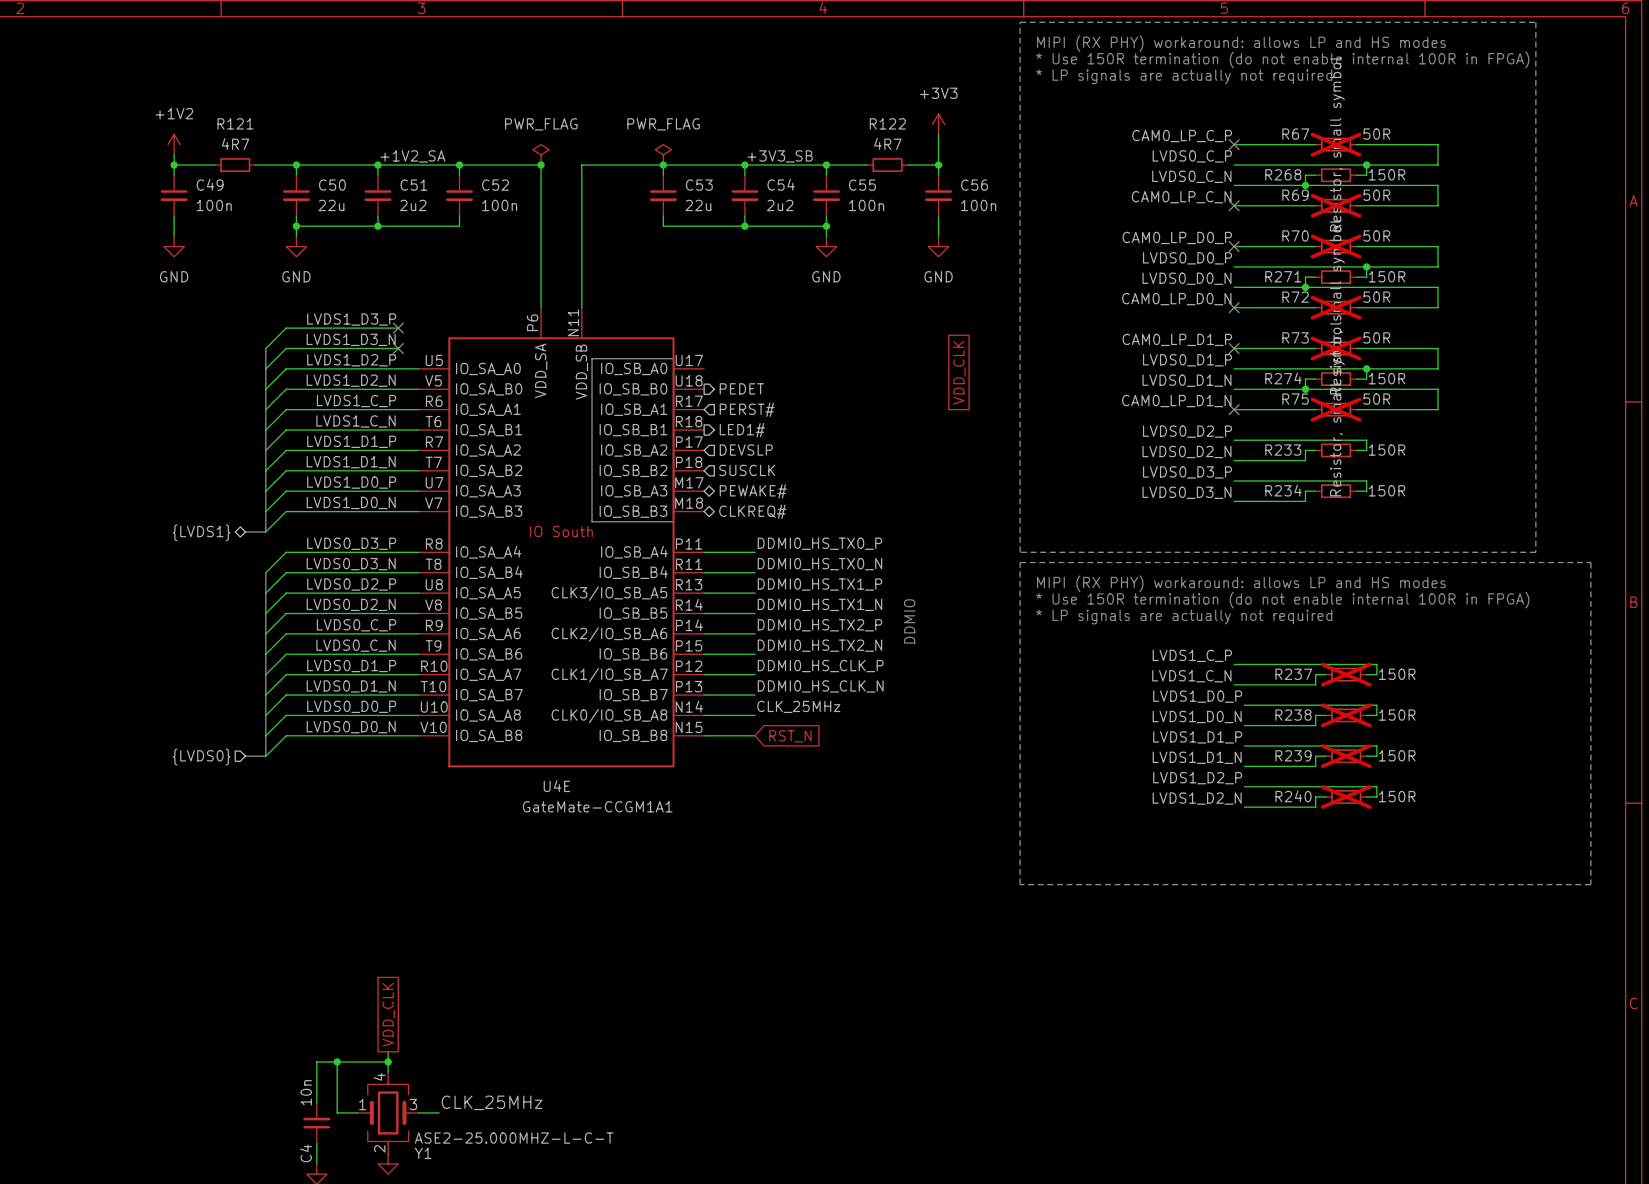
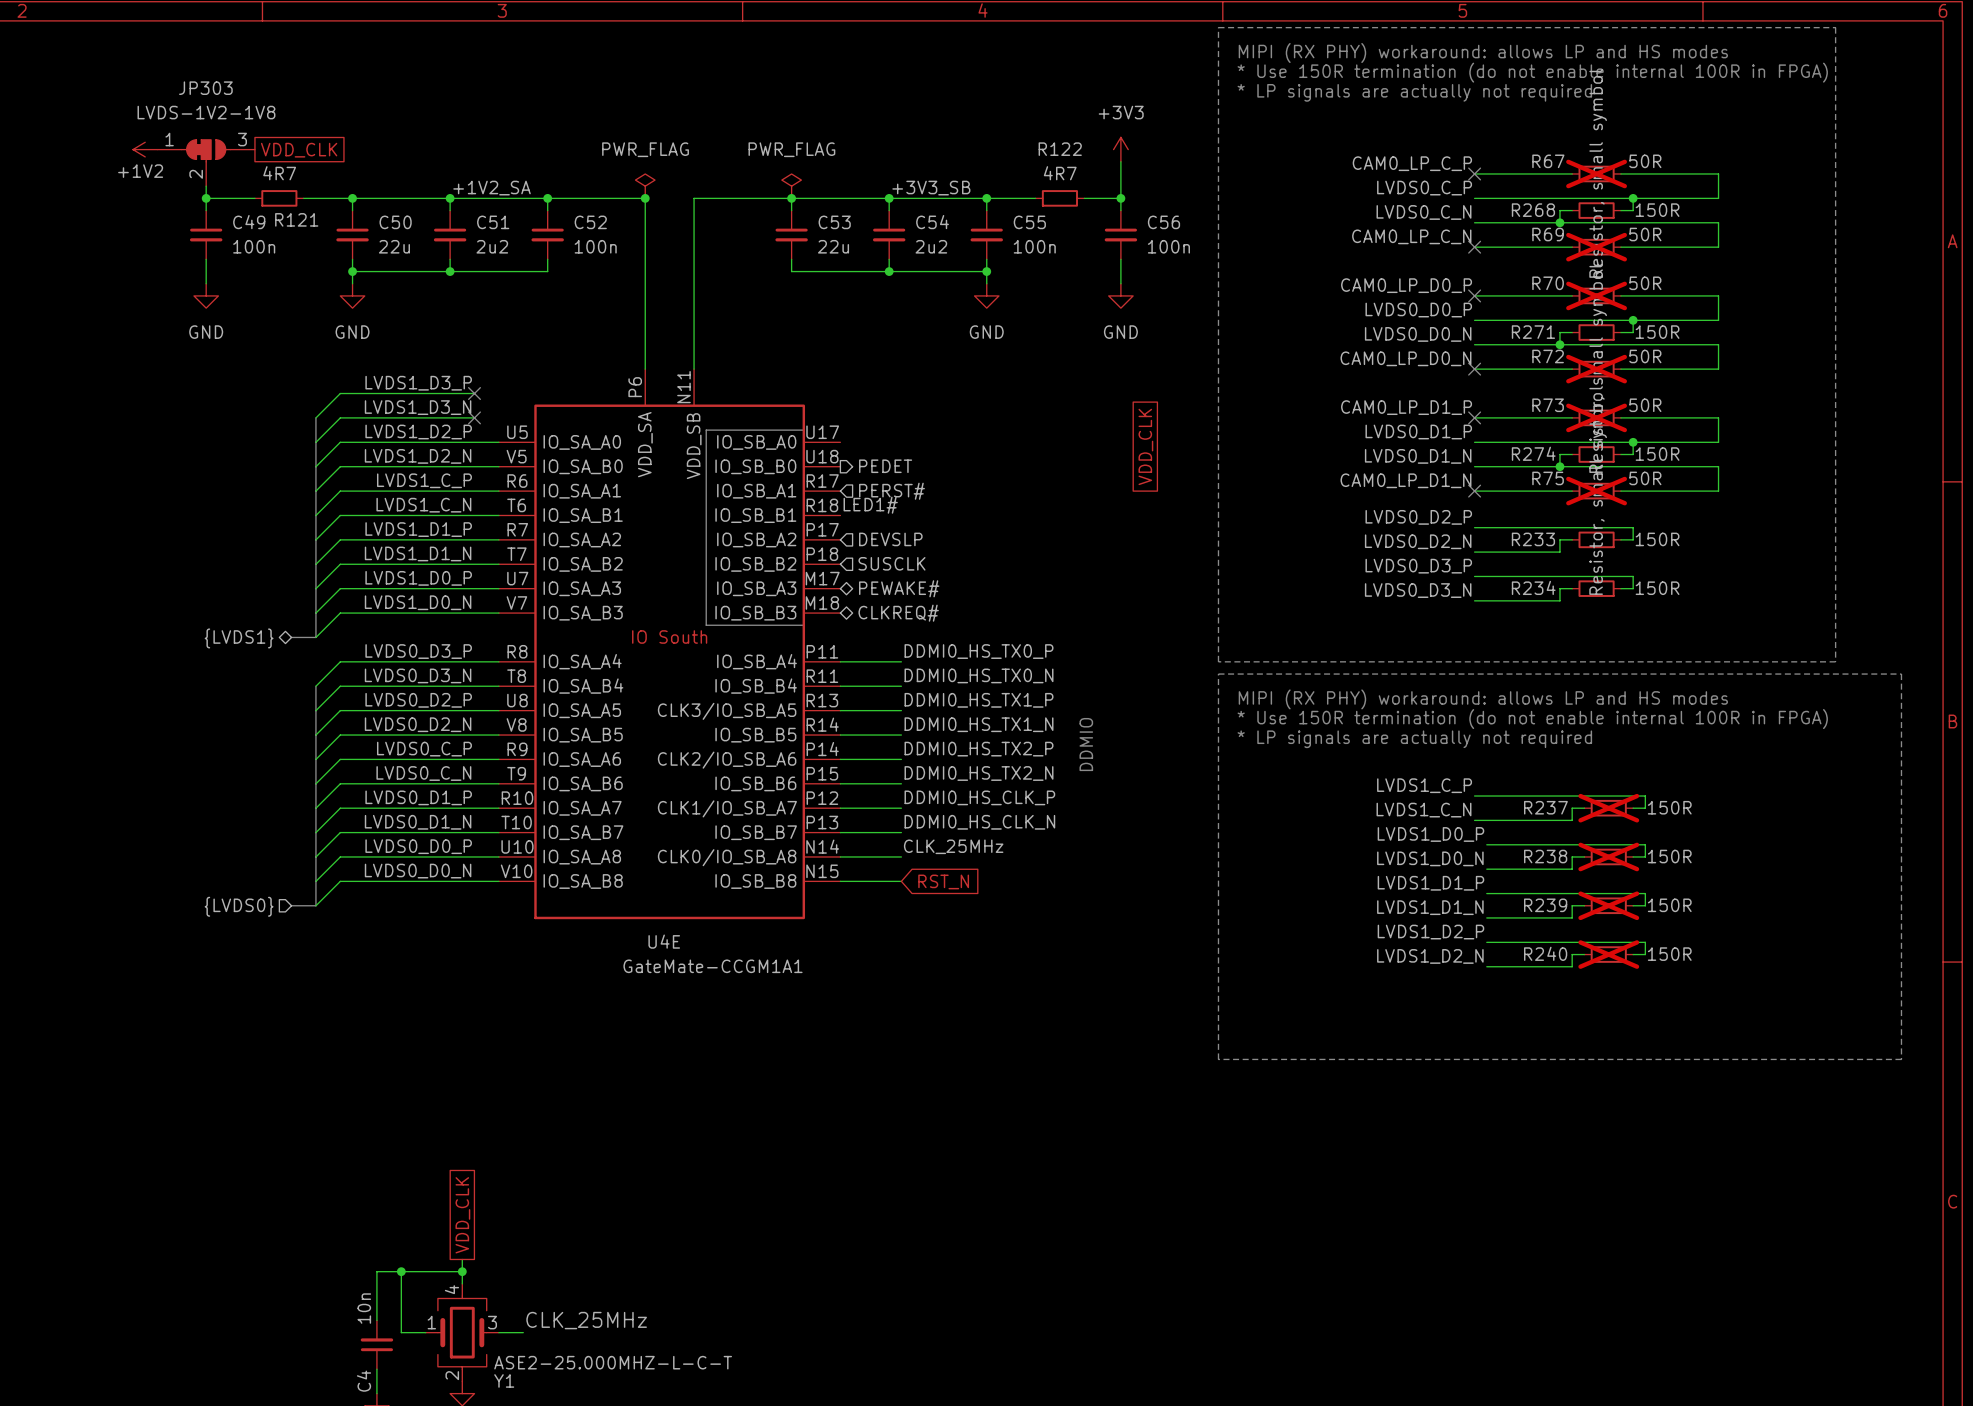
power symbol text position: +1V2 (174, 113) -> +1V2 (140, 171)
R121 name position: R121 (235, 123) -> R121 (296, 219)
global label: none -> VDD_CLK (299, 150)
JP303: none -> LVDS-1V2-1V8 (206, 163)
power symbol rotation: 0° (174, 144) -> 90° counterclockwise (145, 149)
power symbol position: +1V2 (174, 144) -> +1V2 (145, 149)
label: none -> LED1# (870, 505)
hierarchical label: LED1# (742, 430) -> none

